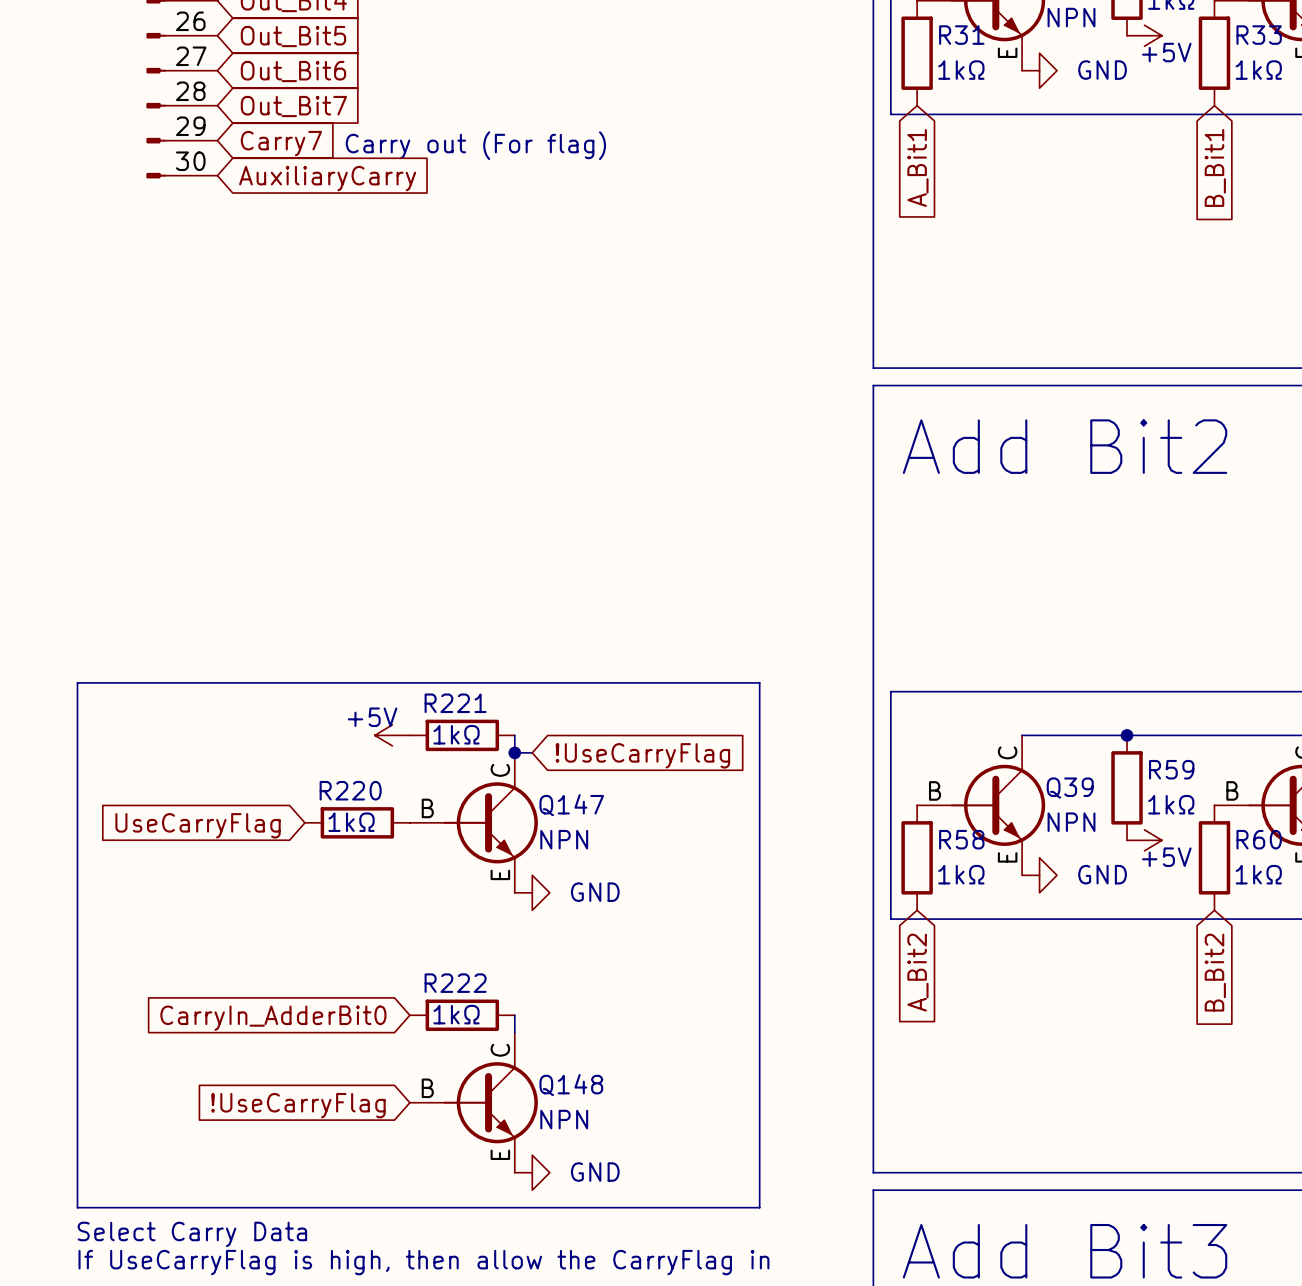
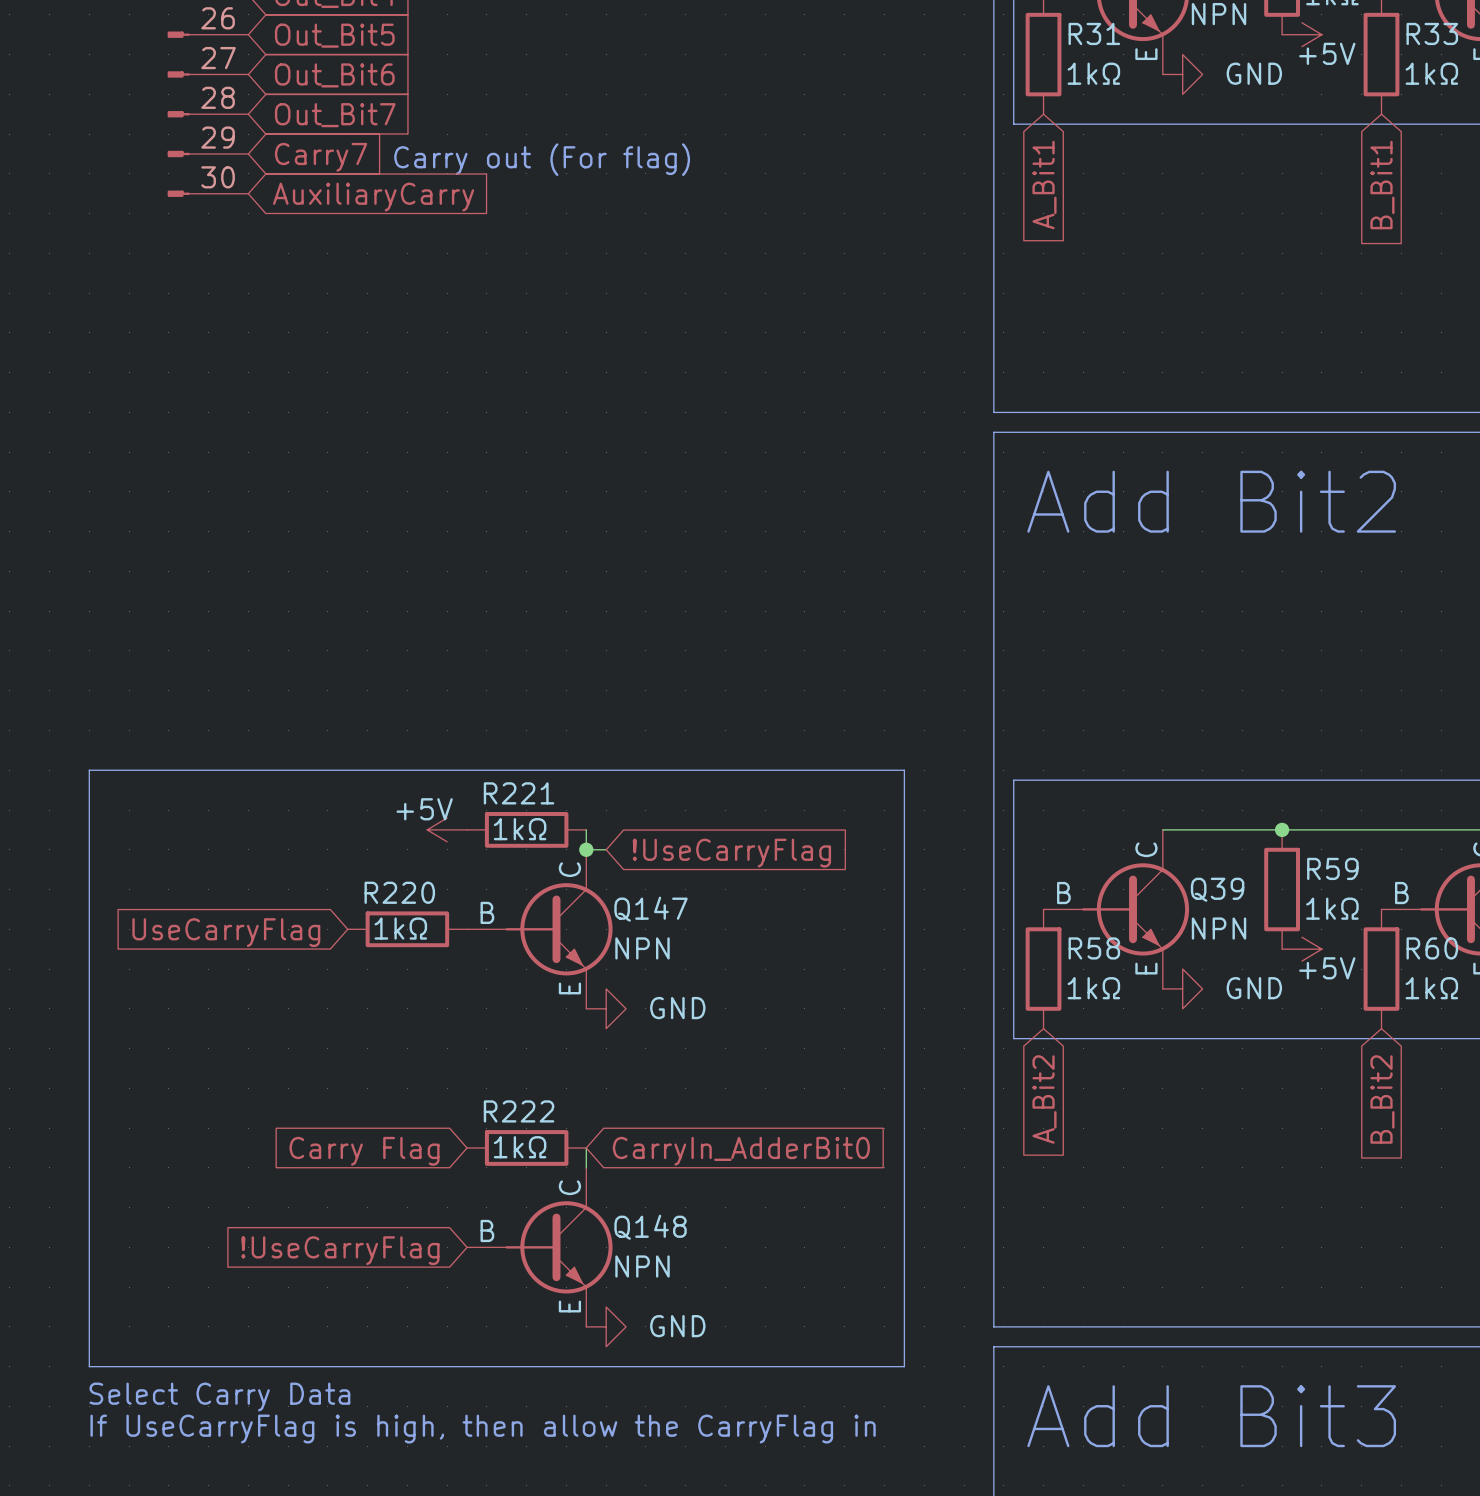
line: (759, 682) (759, 1207) -> (864, 770) (904, 770) (904, 1366) (864, 1366)
global label: CarryIn_AdderBit0 (273, 1018) -> Carry Flag (364, 1151)
global label: none -> CarryIn_AdderBit0 (741, 1151)

